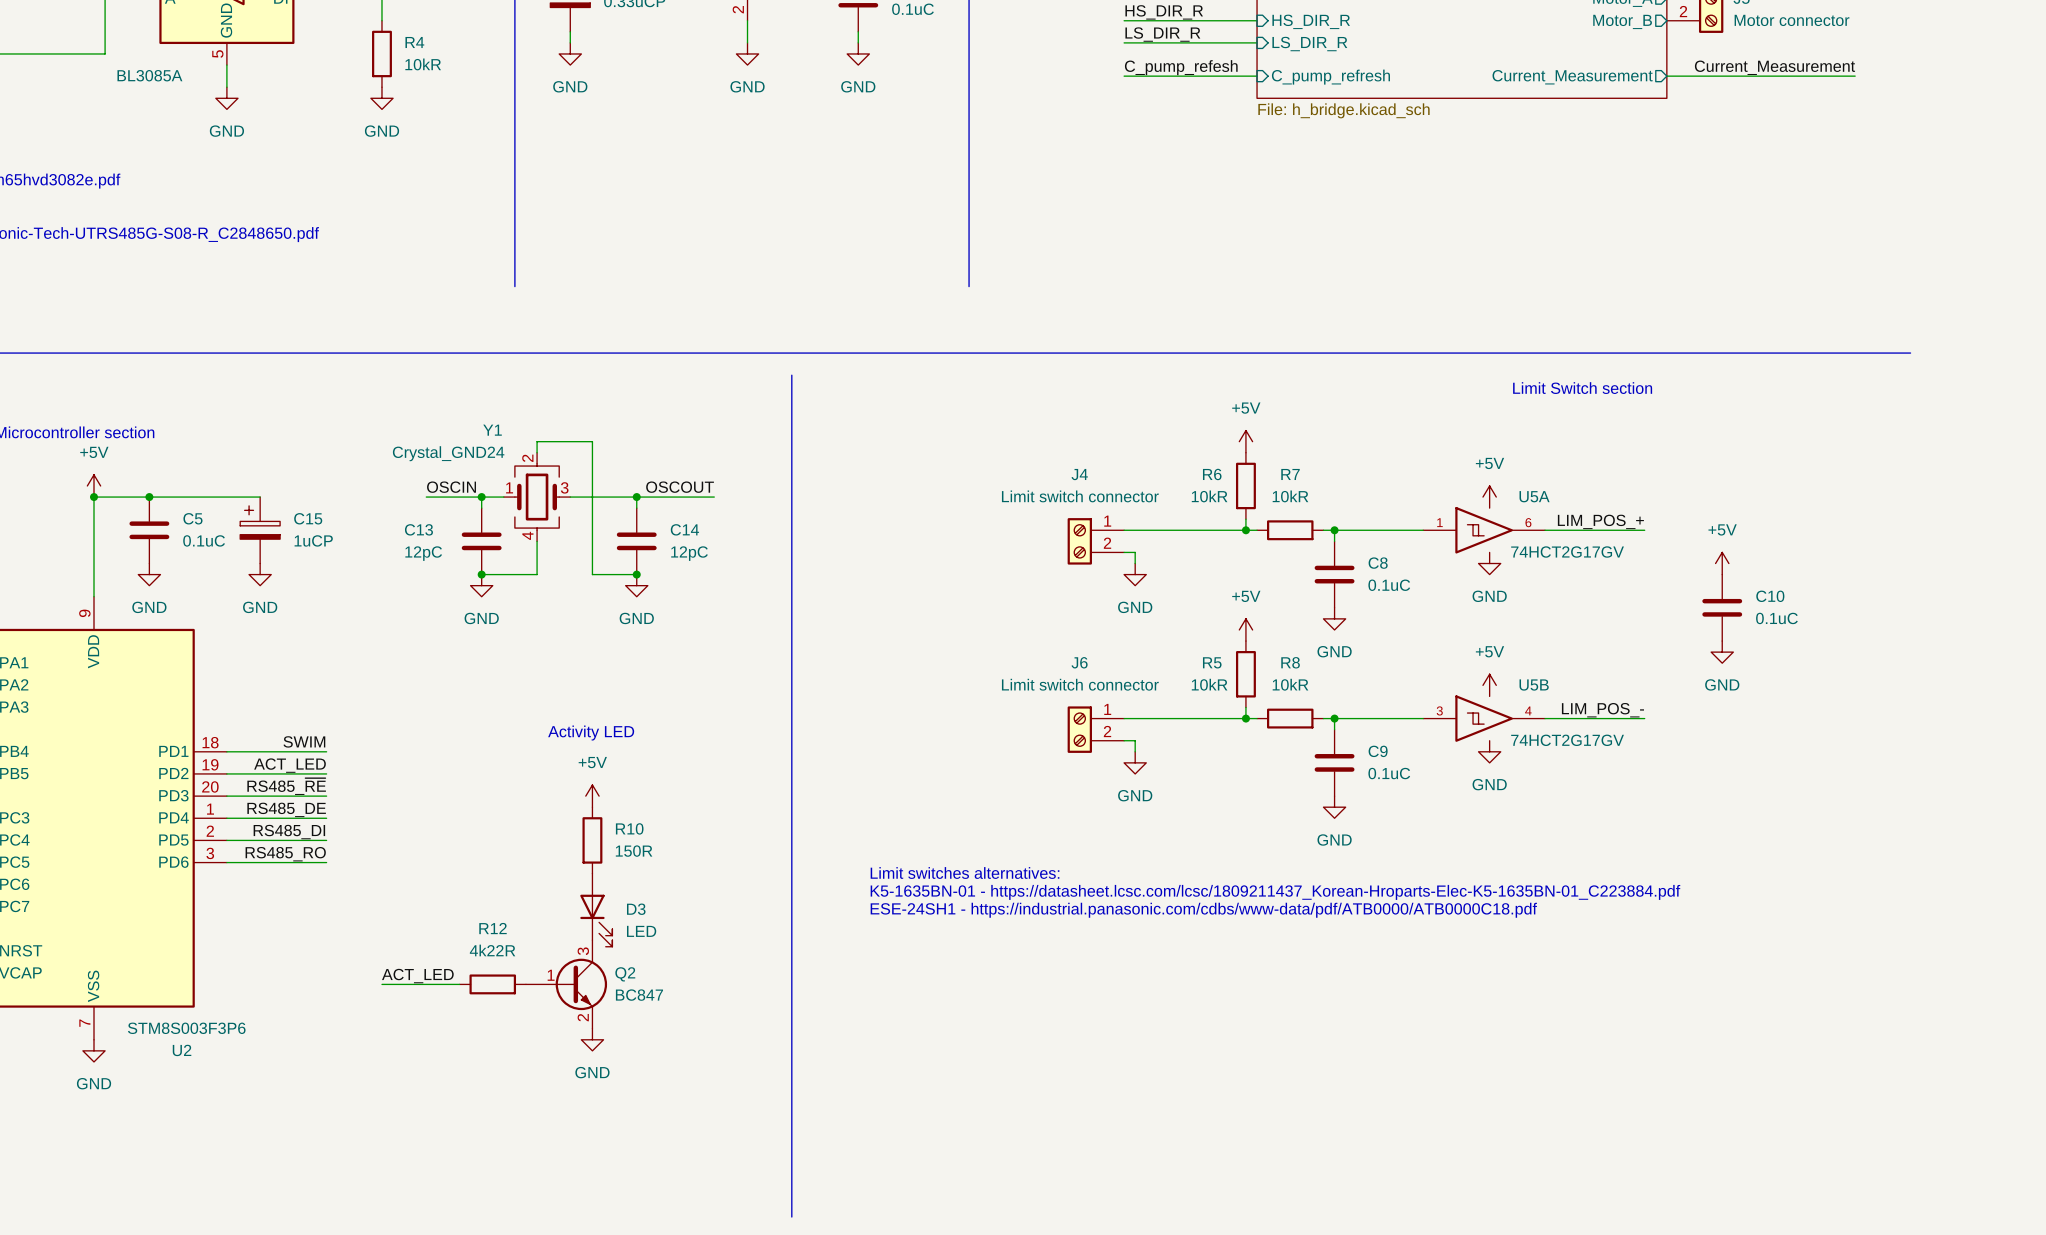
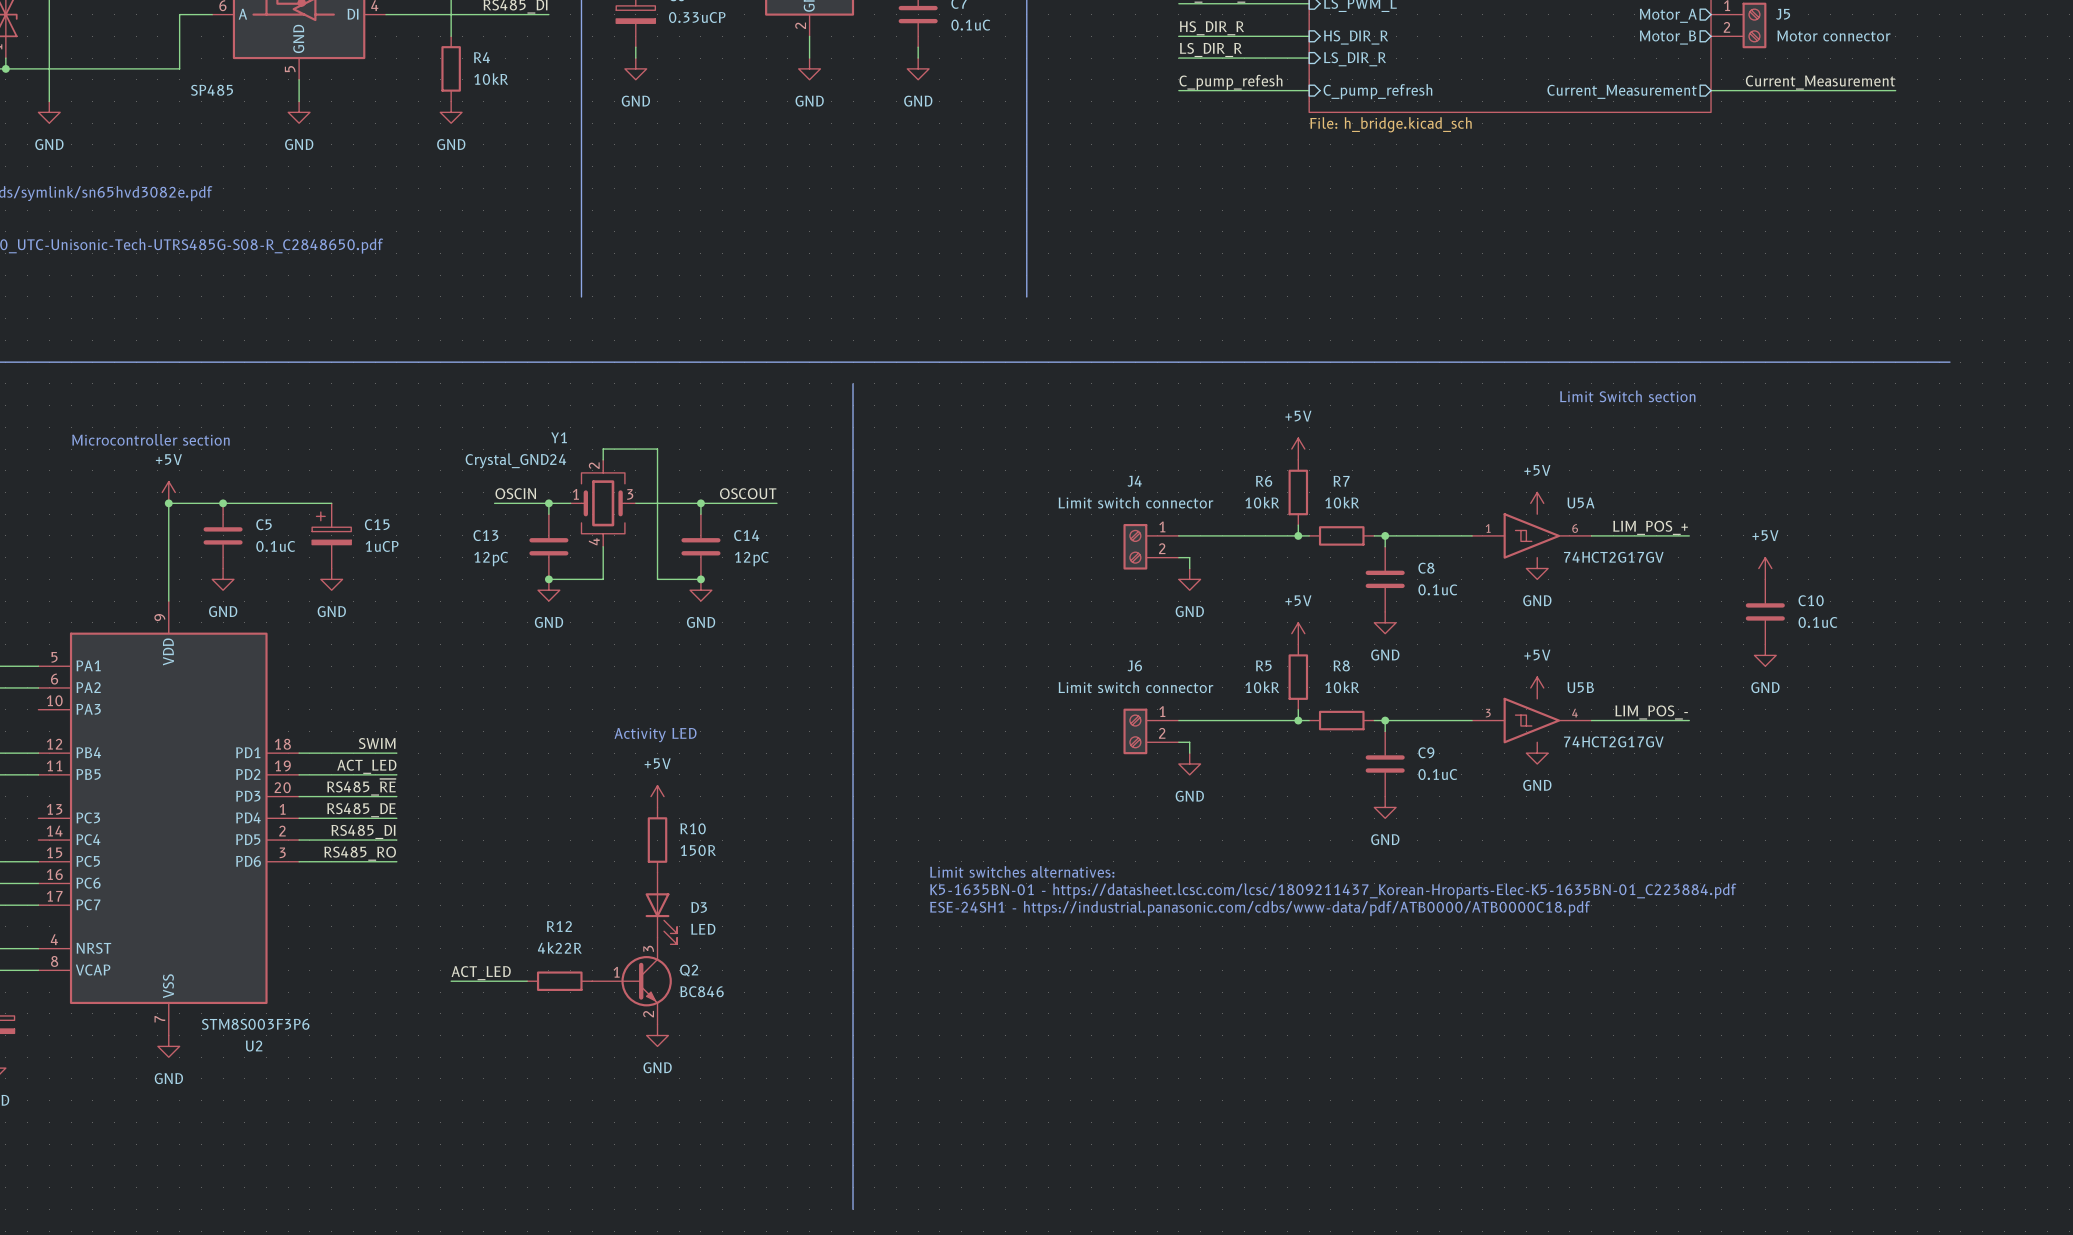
part value: BL3085A (149, 75) -> SP485 (212, 90)
Q2 value: BC847 (639, 995) -> BC846 (702, 991)

